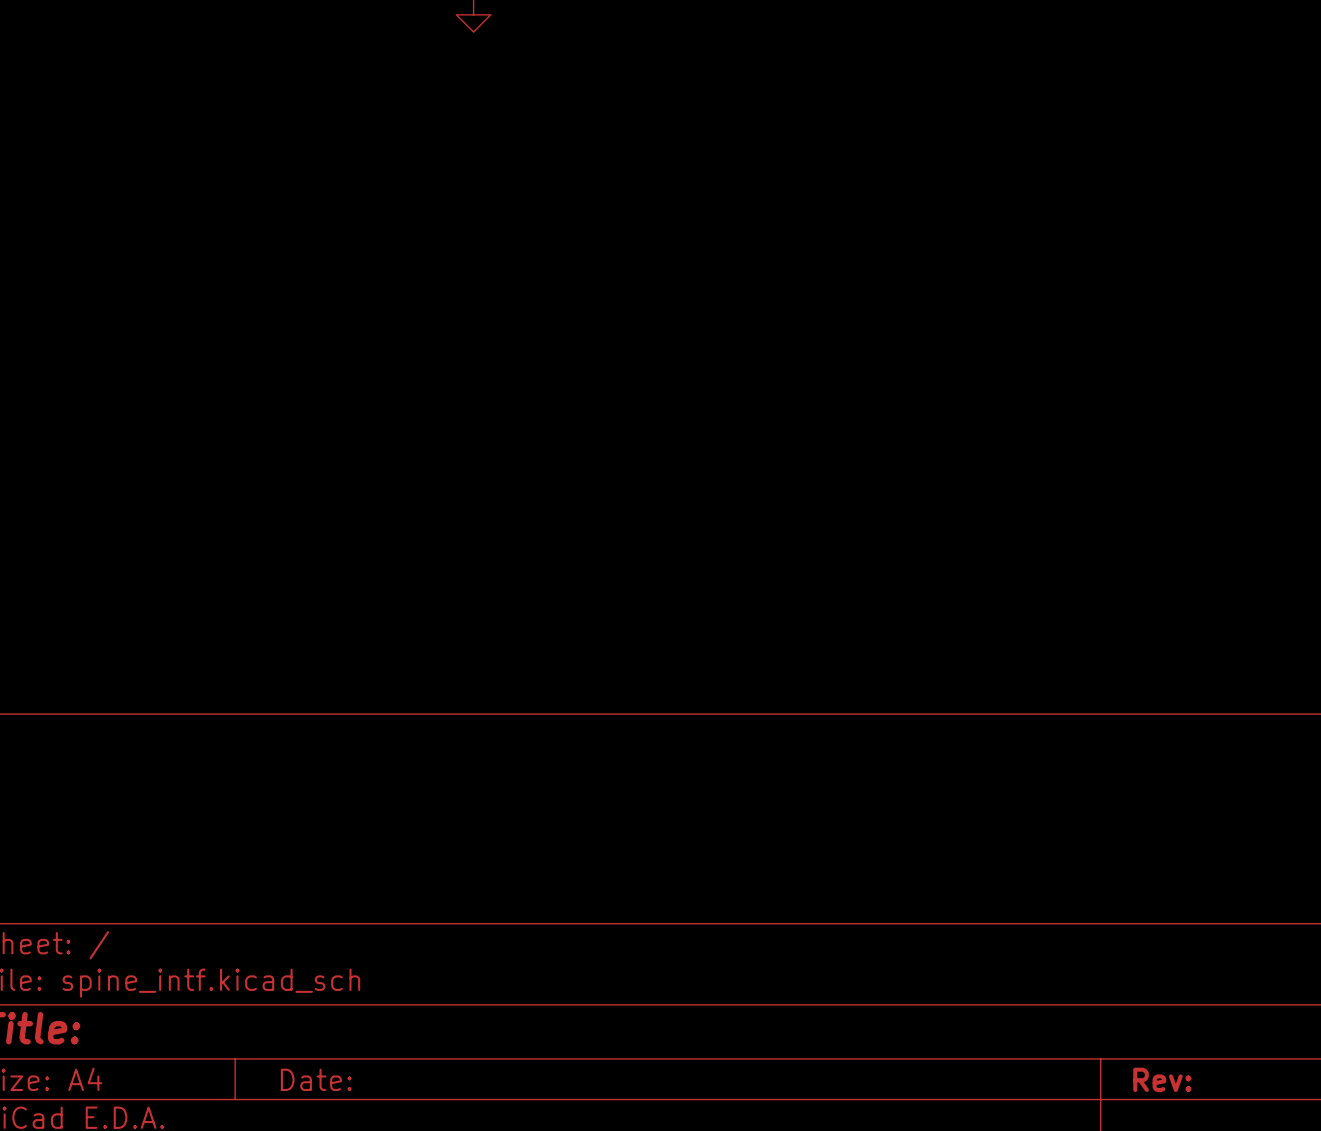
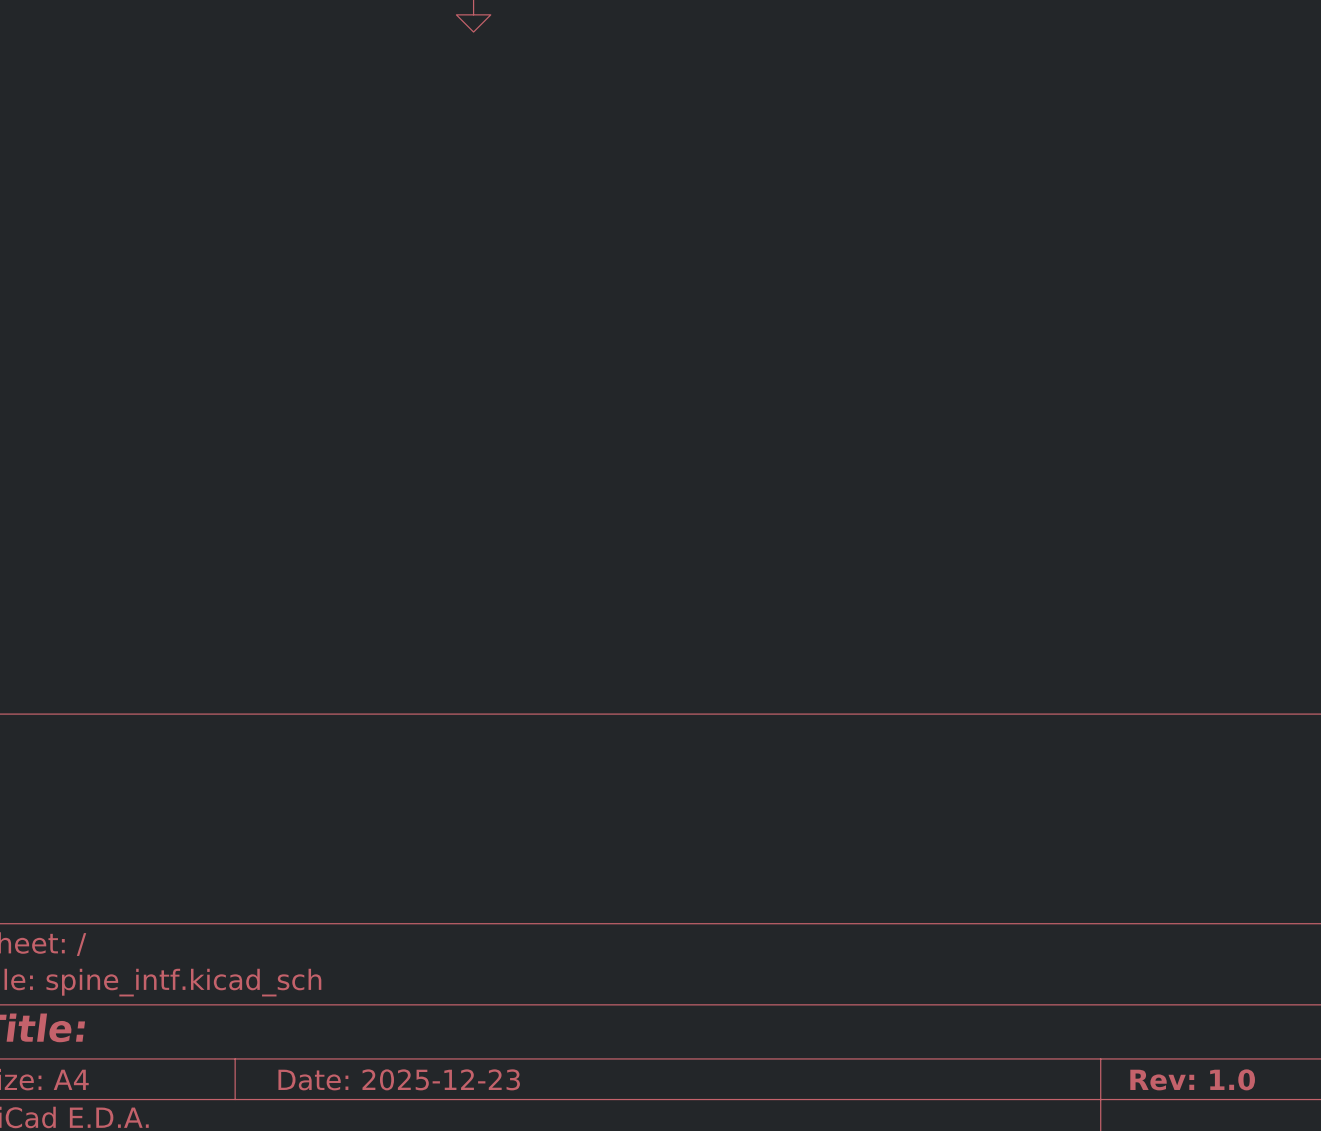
title block: Date: (316, 1079) -> Date: 2025-12-23 (399, 1079)
title block: Rev: (1162, 1079) -> Rev: 1.0 (1192, 1079)

